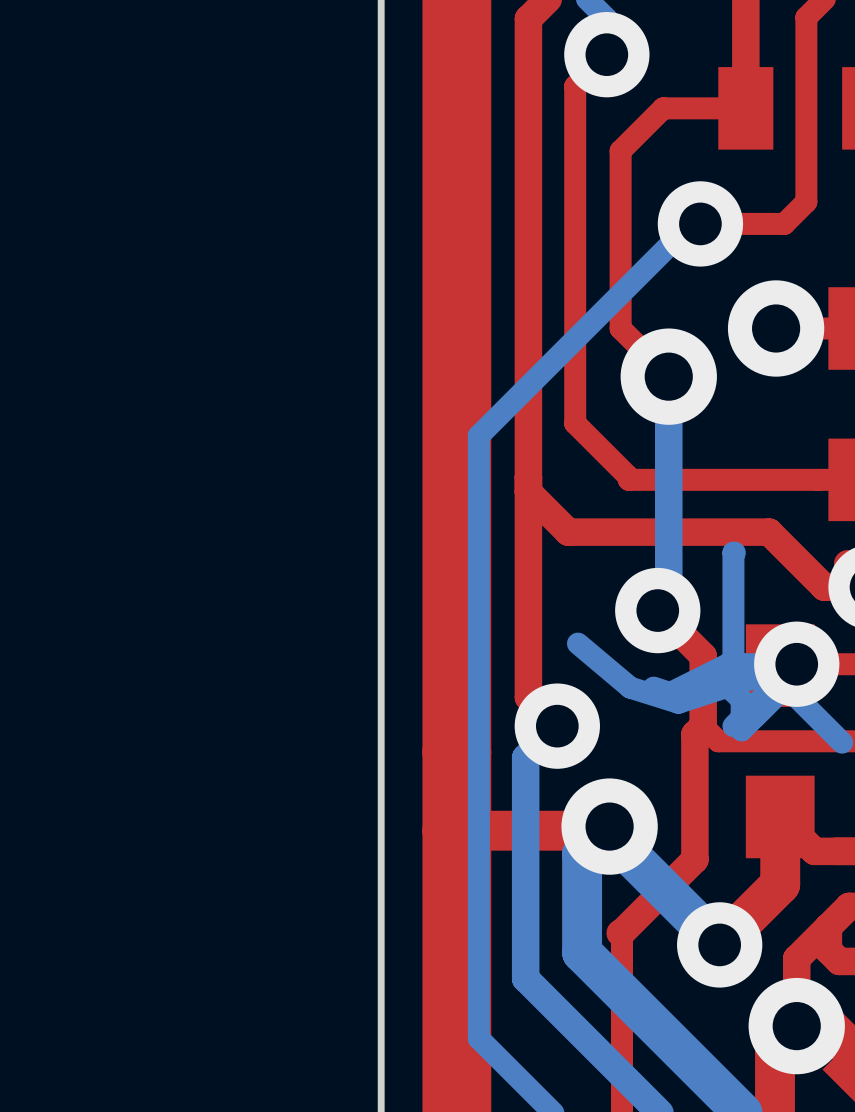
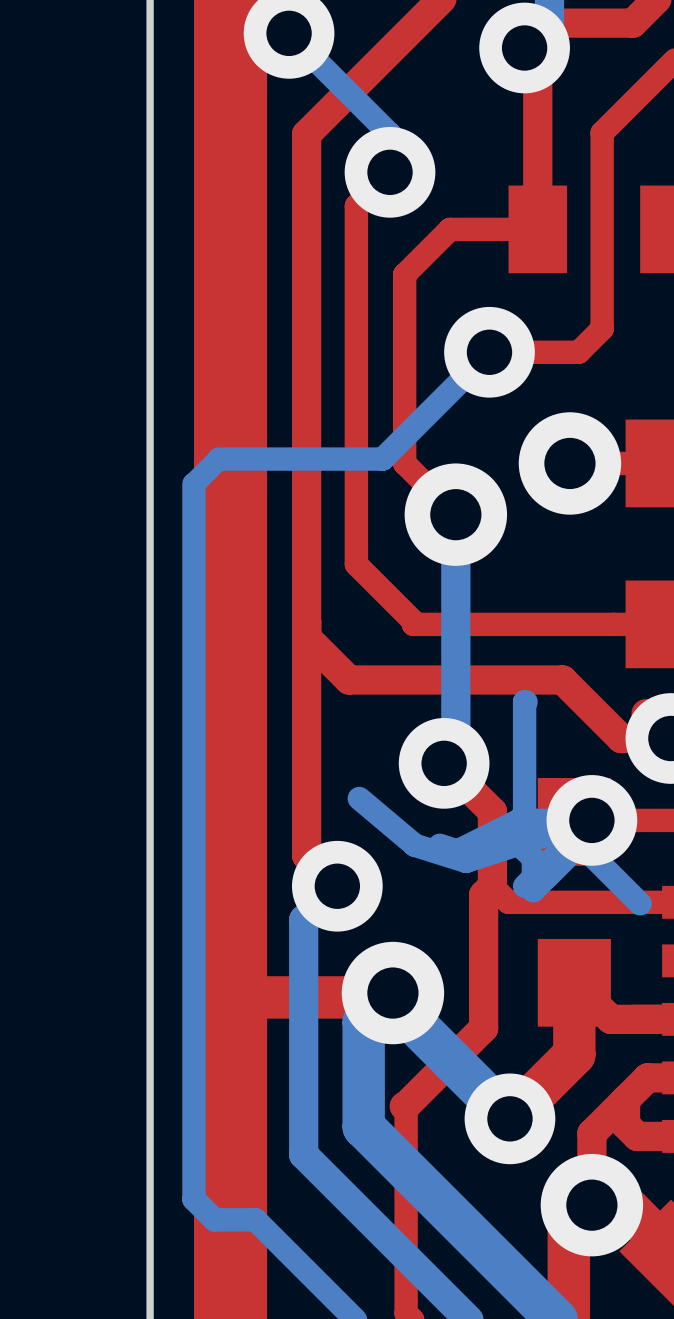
bottom track: (700, 223) (690, 223) (478, 435) (478, 1038) -> (489, 352) (382, 459) (218, 459) (193, 483) (193, 1199) (214, 1219) (255, 1219)

